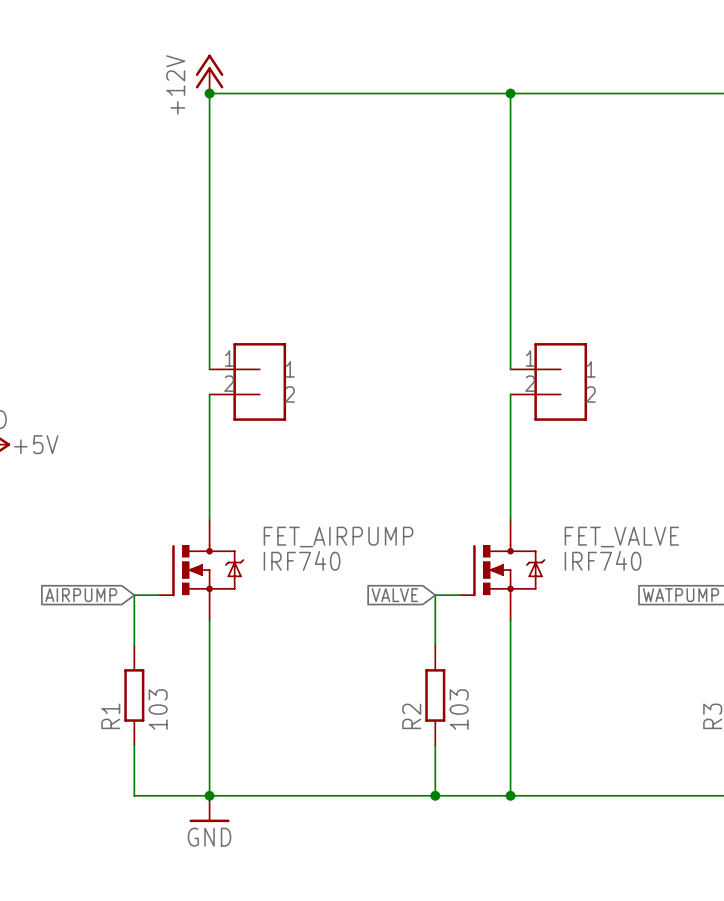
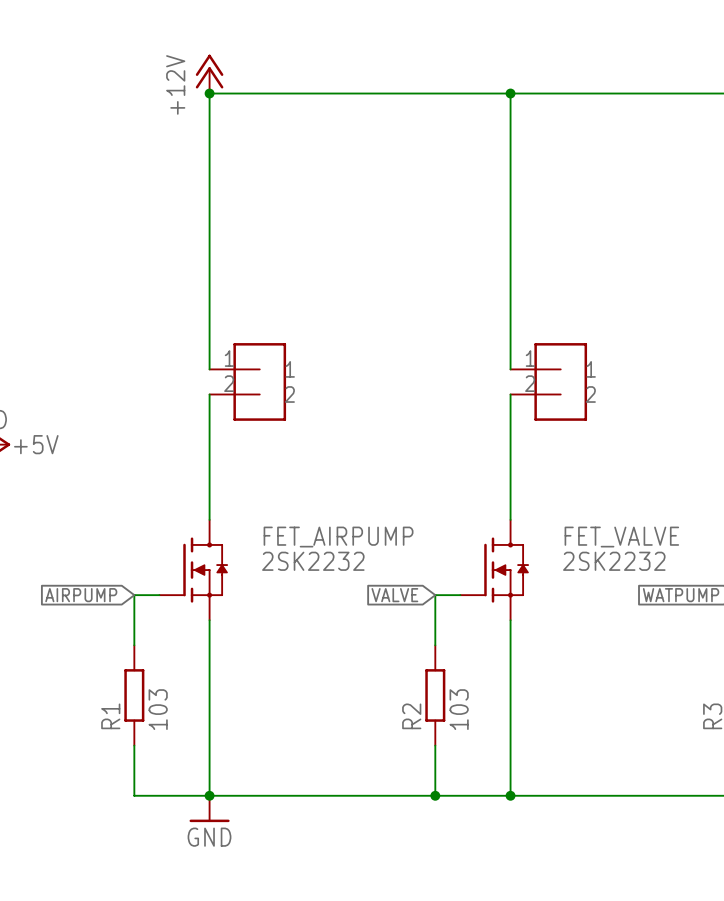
FET_AIRPUMP symbol: [158, 519, 245, 621] -> [159, 519, 228, 621]
FET_VALVE symbol: [459, 519, 546, 621] -> [460, 519, 529, 621]
FET_AIRPUMP value: IRF740 (302, 560) -> 2SK2232 (313, 561)
FET_VALVE value: IRF740 (603, 560) -> 2SK2232 (614, 561)

